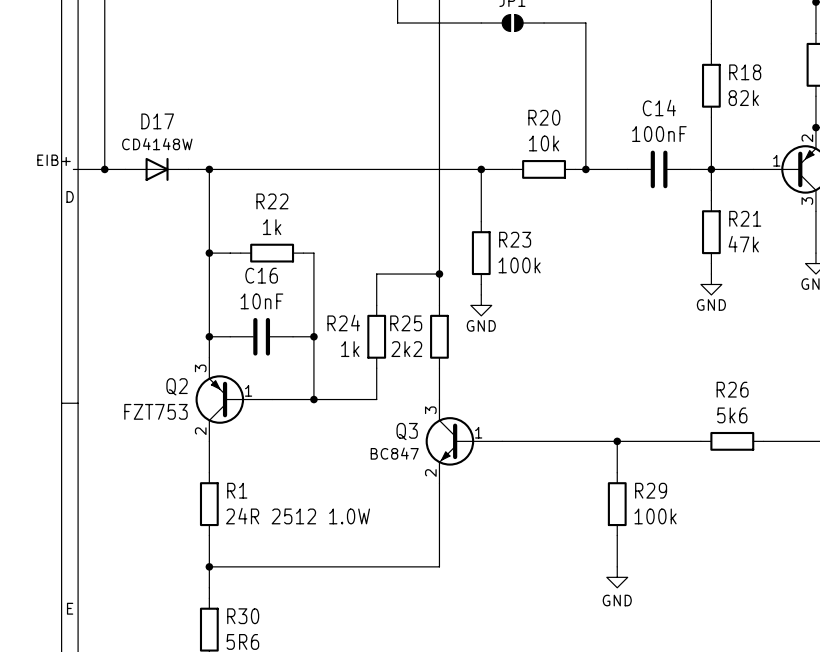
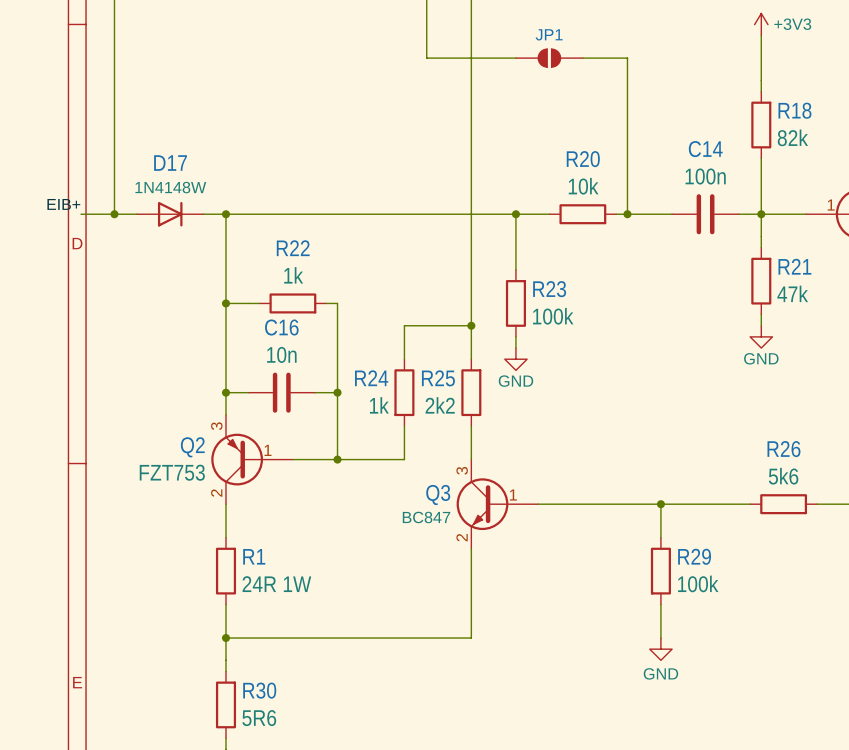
C14 value: 100nF (659, 134) -> 100n (705, 176)
D17 value: CD4148W (157, 144) -> 1N4148W (170, 187)
C16 value: 10nF (261, 301) -> 10n (281, 354)
R1 value: 24R 2512 1.0W (298, 516) -> 24R 1W (276, 584)

